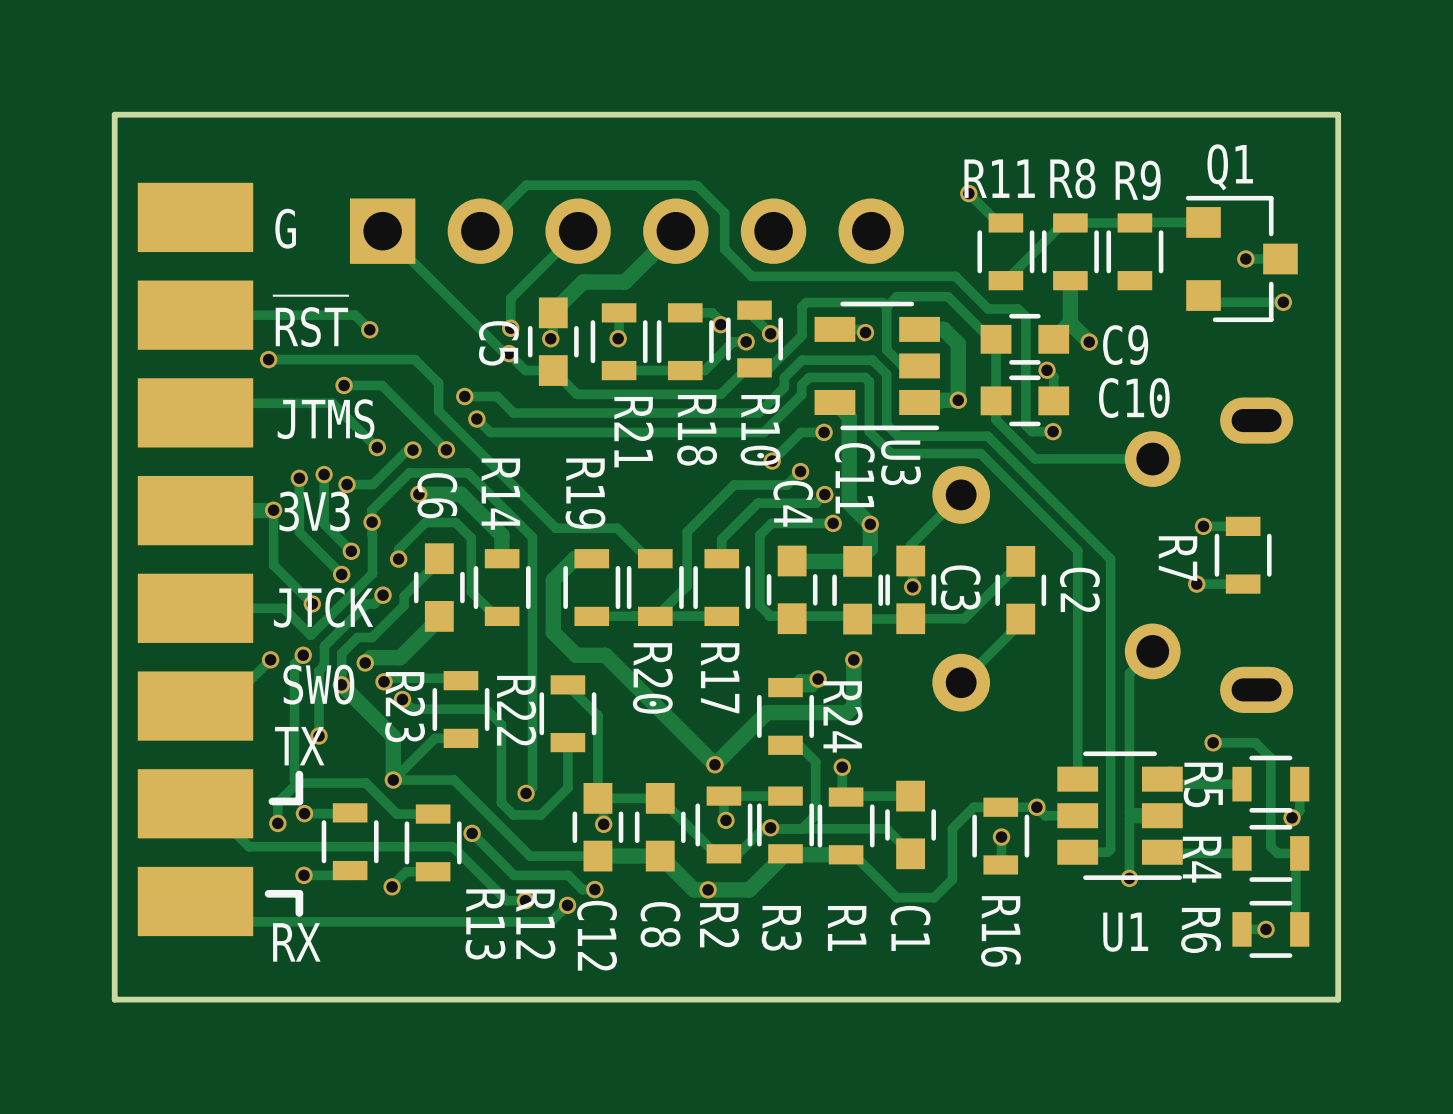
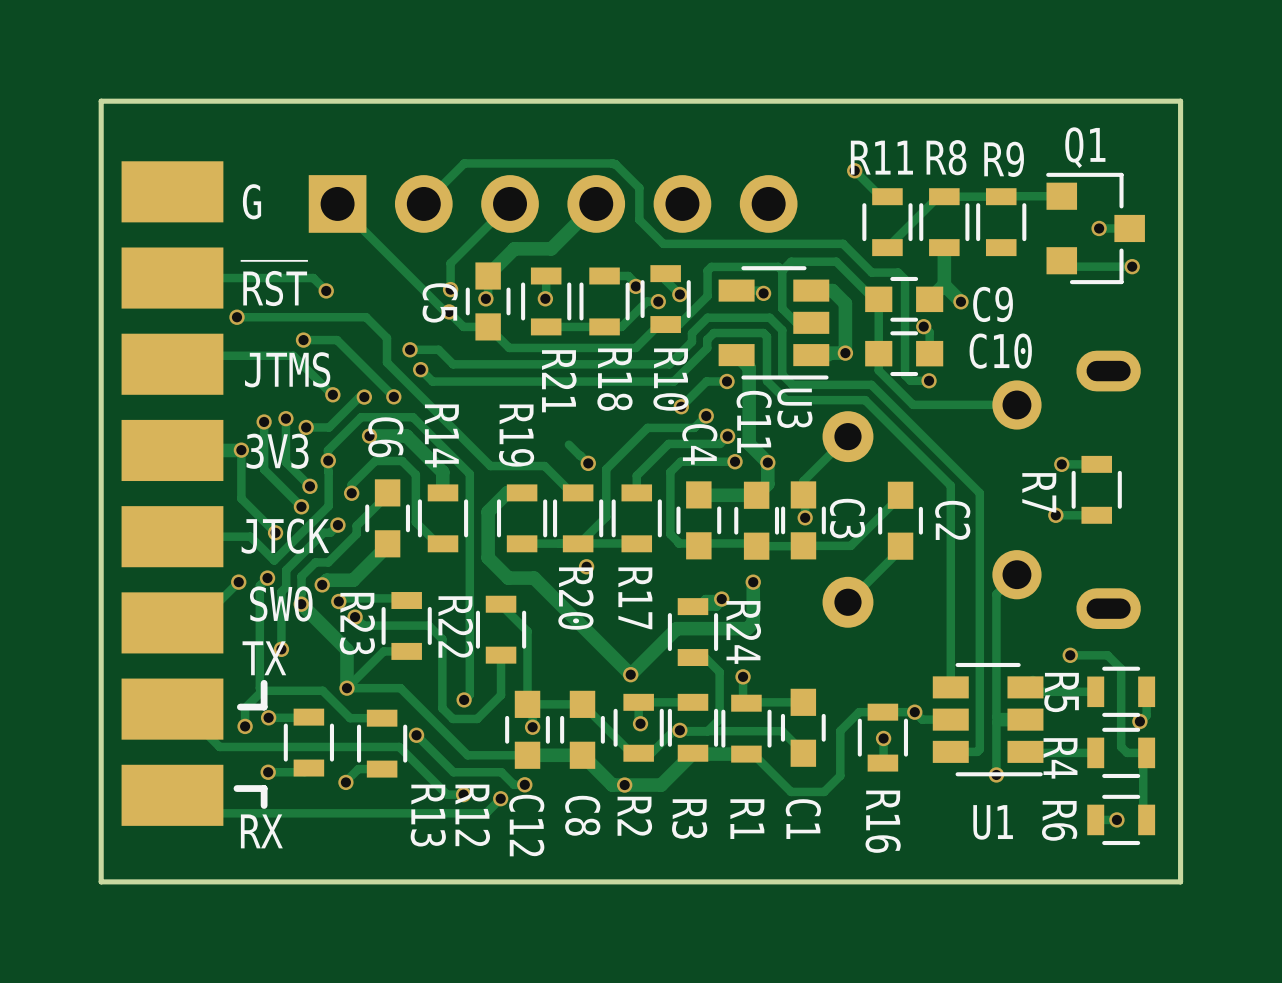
track: none -> (568, 444) (579, 455)
via: none -> (588, 463)
via: none -> (586, 566)

